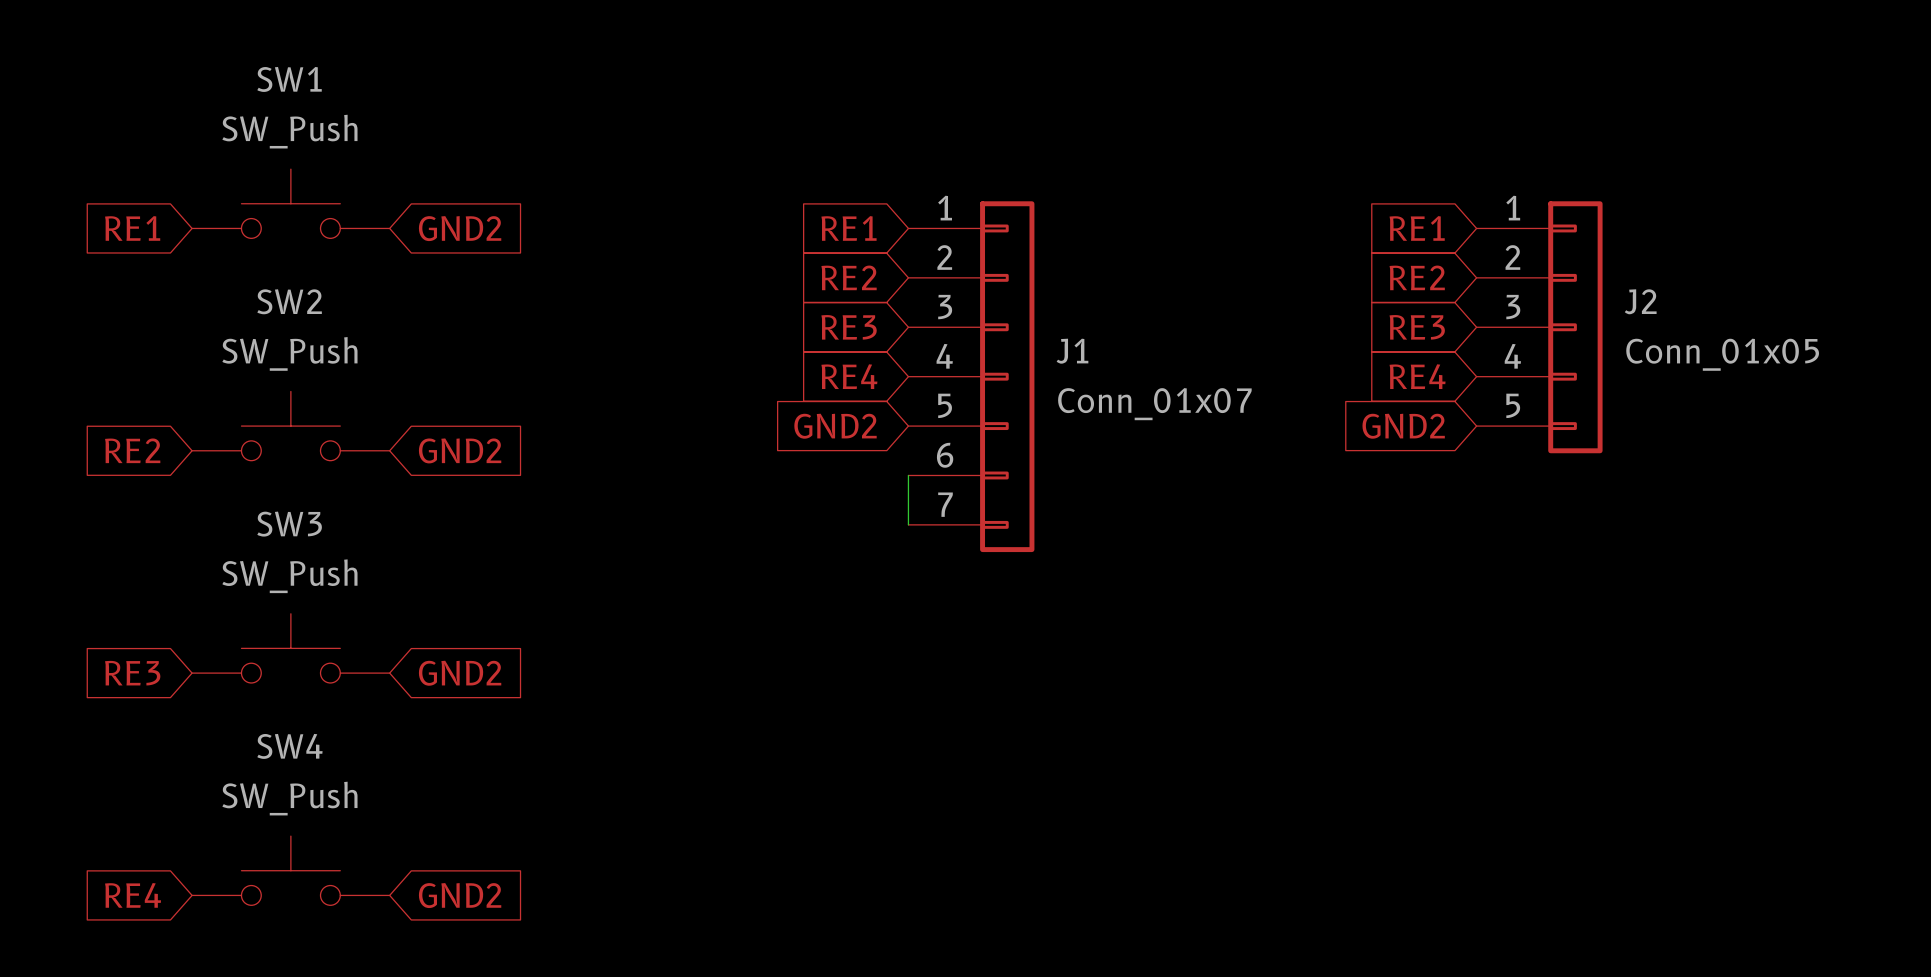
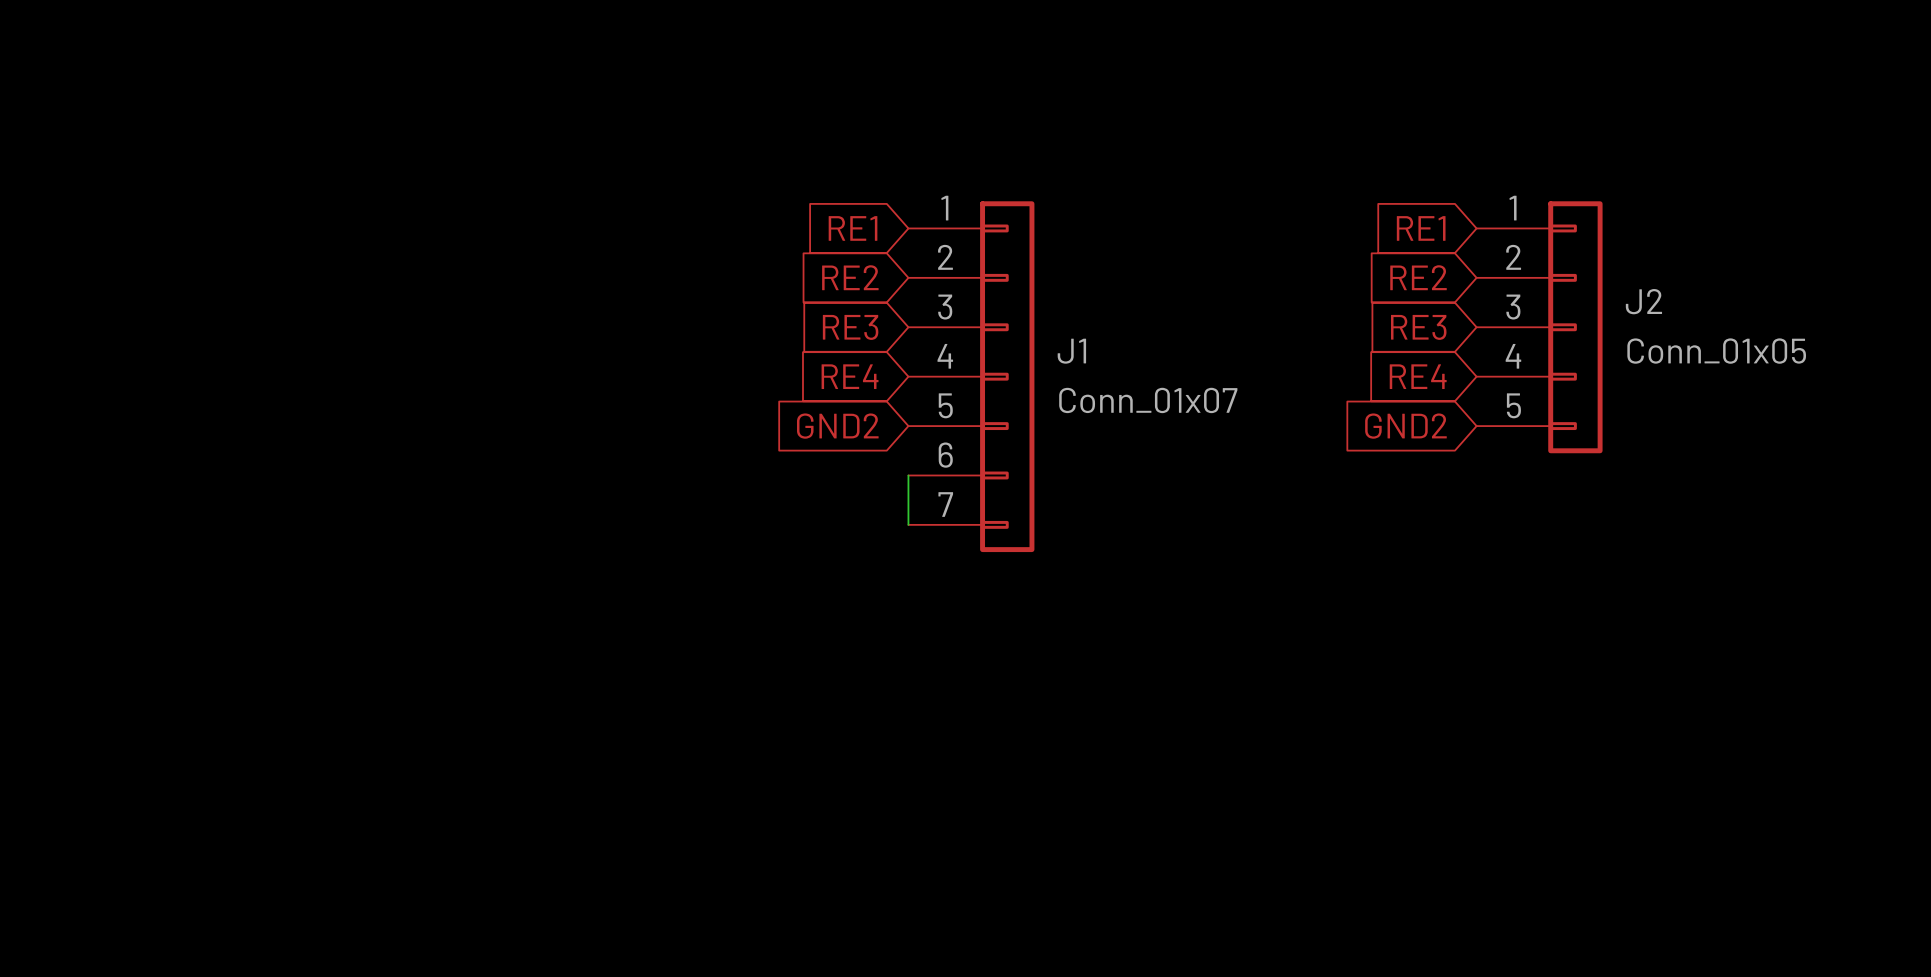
SW1: SW_Push (290, 203) -> none
global label: RE1 (132, 228) -> none
global label: GND2 (460, 228) -> none
SW2: SW_Push (290, 426) -> none
global label: RE2 (132, 450) -> none
global label: GND2 (460, 450) -> none
SW3: SW_Push (290, 648) -> none
global label: RE3 (132, 673) -> none
global label: GND2 (460, 673) -> none
SW4: SW_Push (290, 870) -> none
global label: RE4 (133, 895) -> none
global label: GND2 (460, 895) -> none

